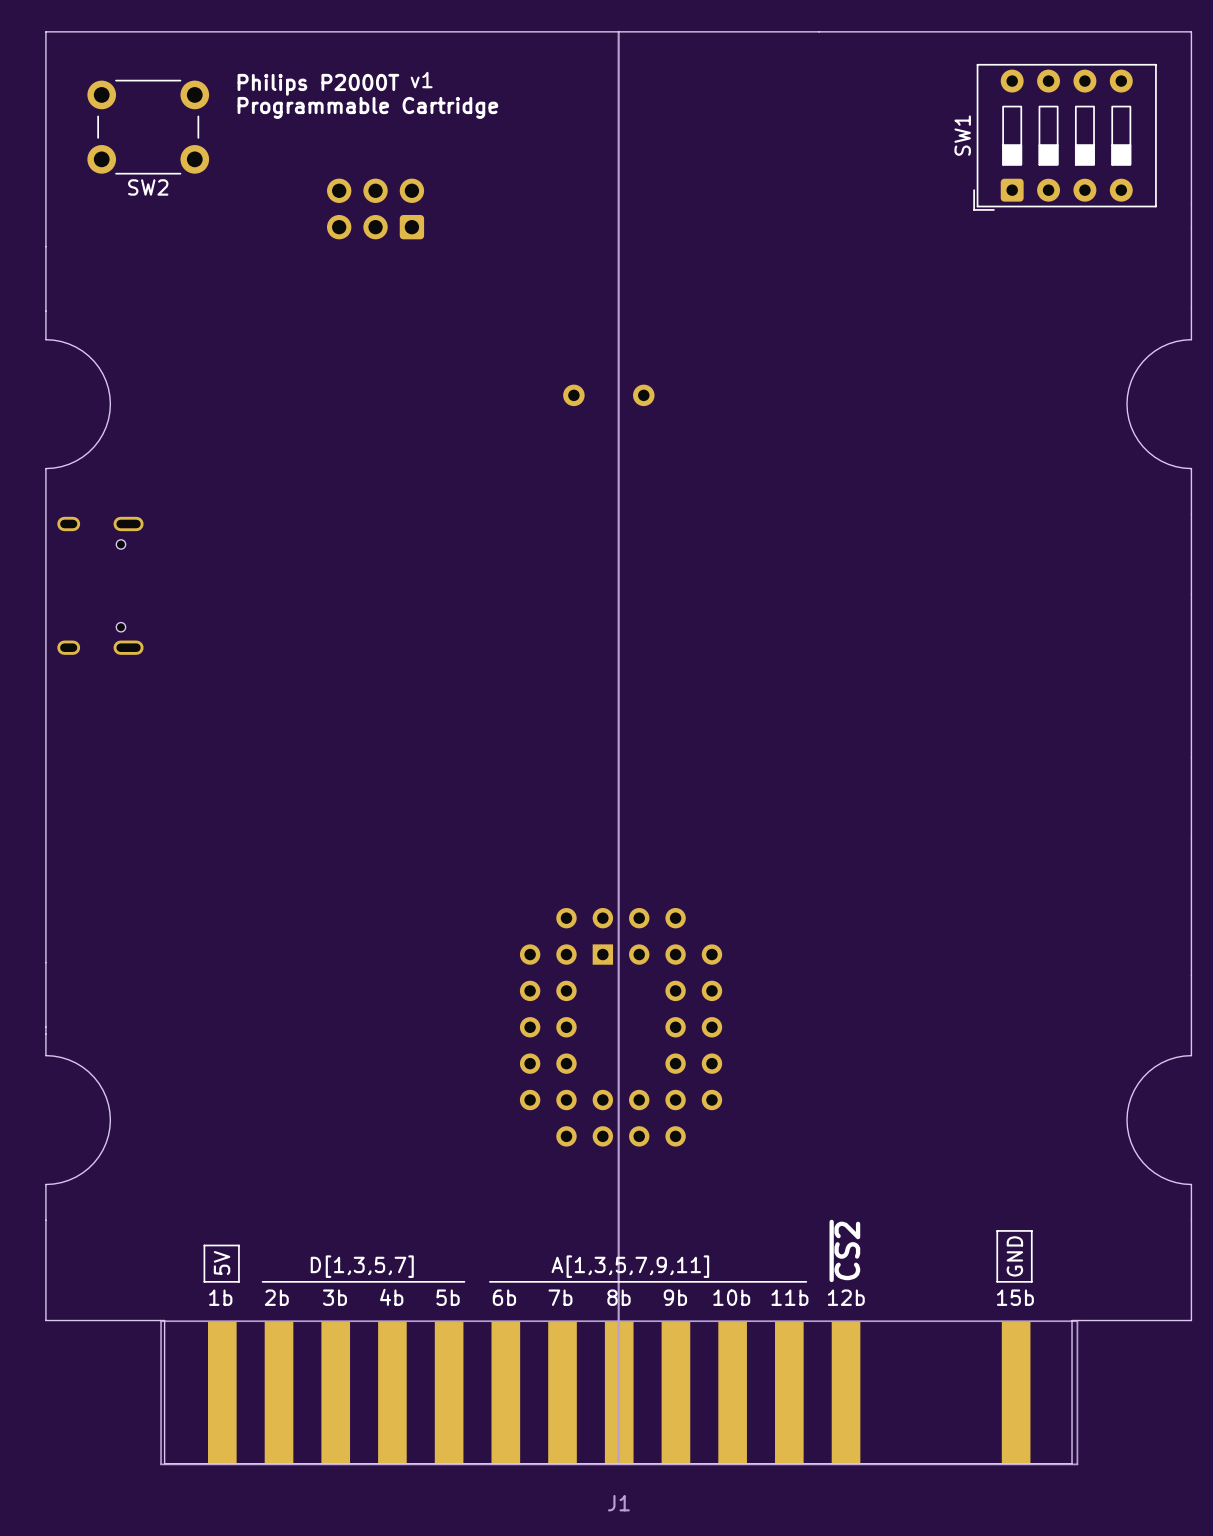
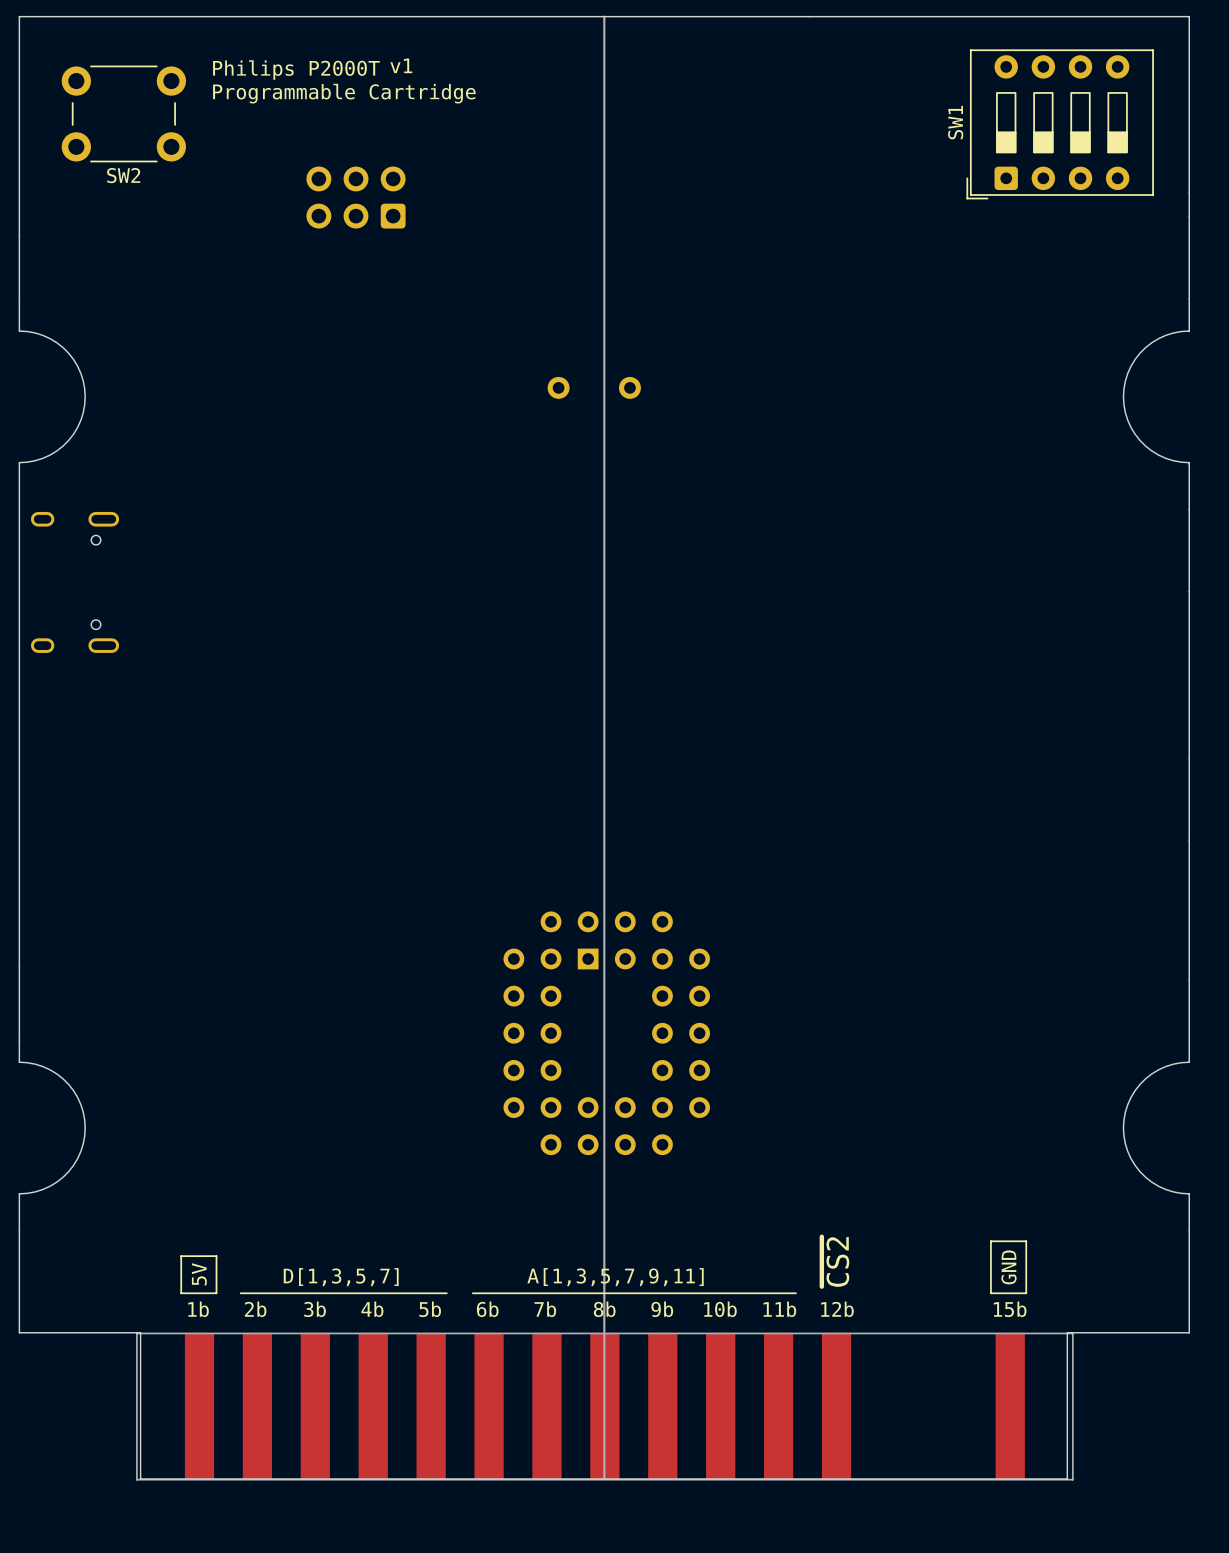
J1 name: J1 (618, 1503) -> none

